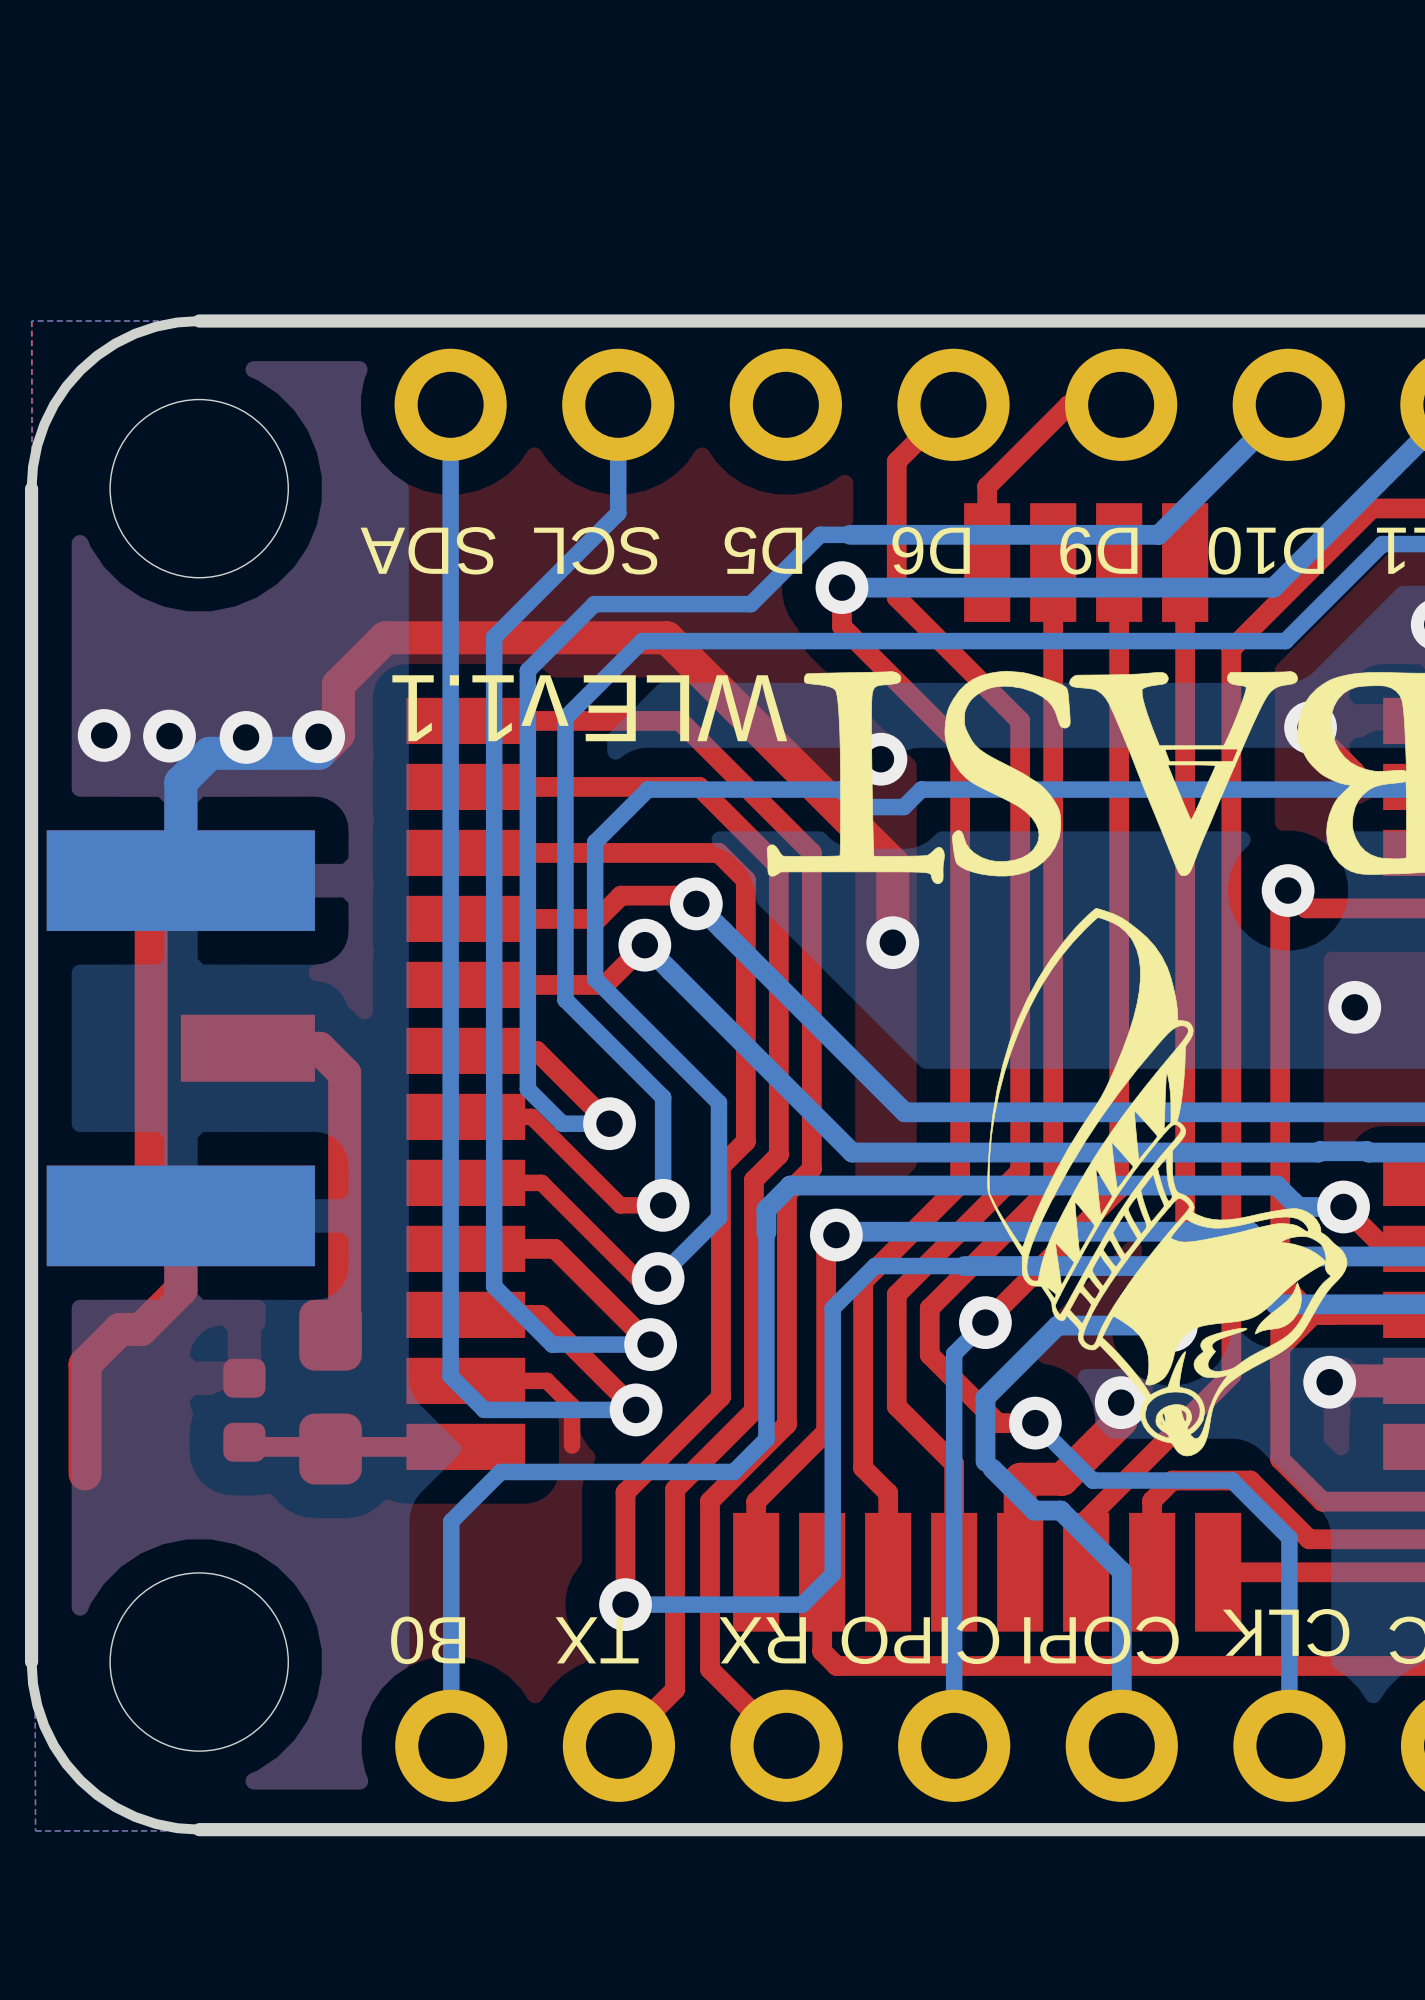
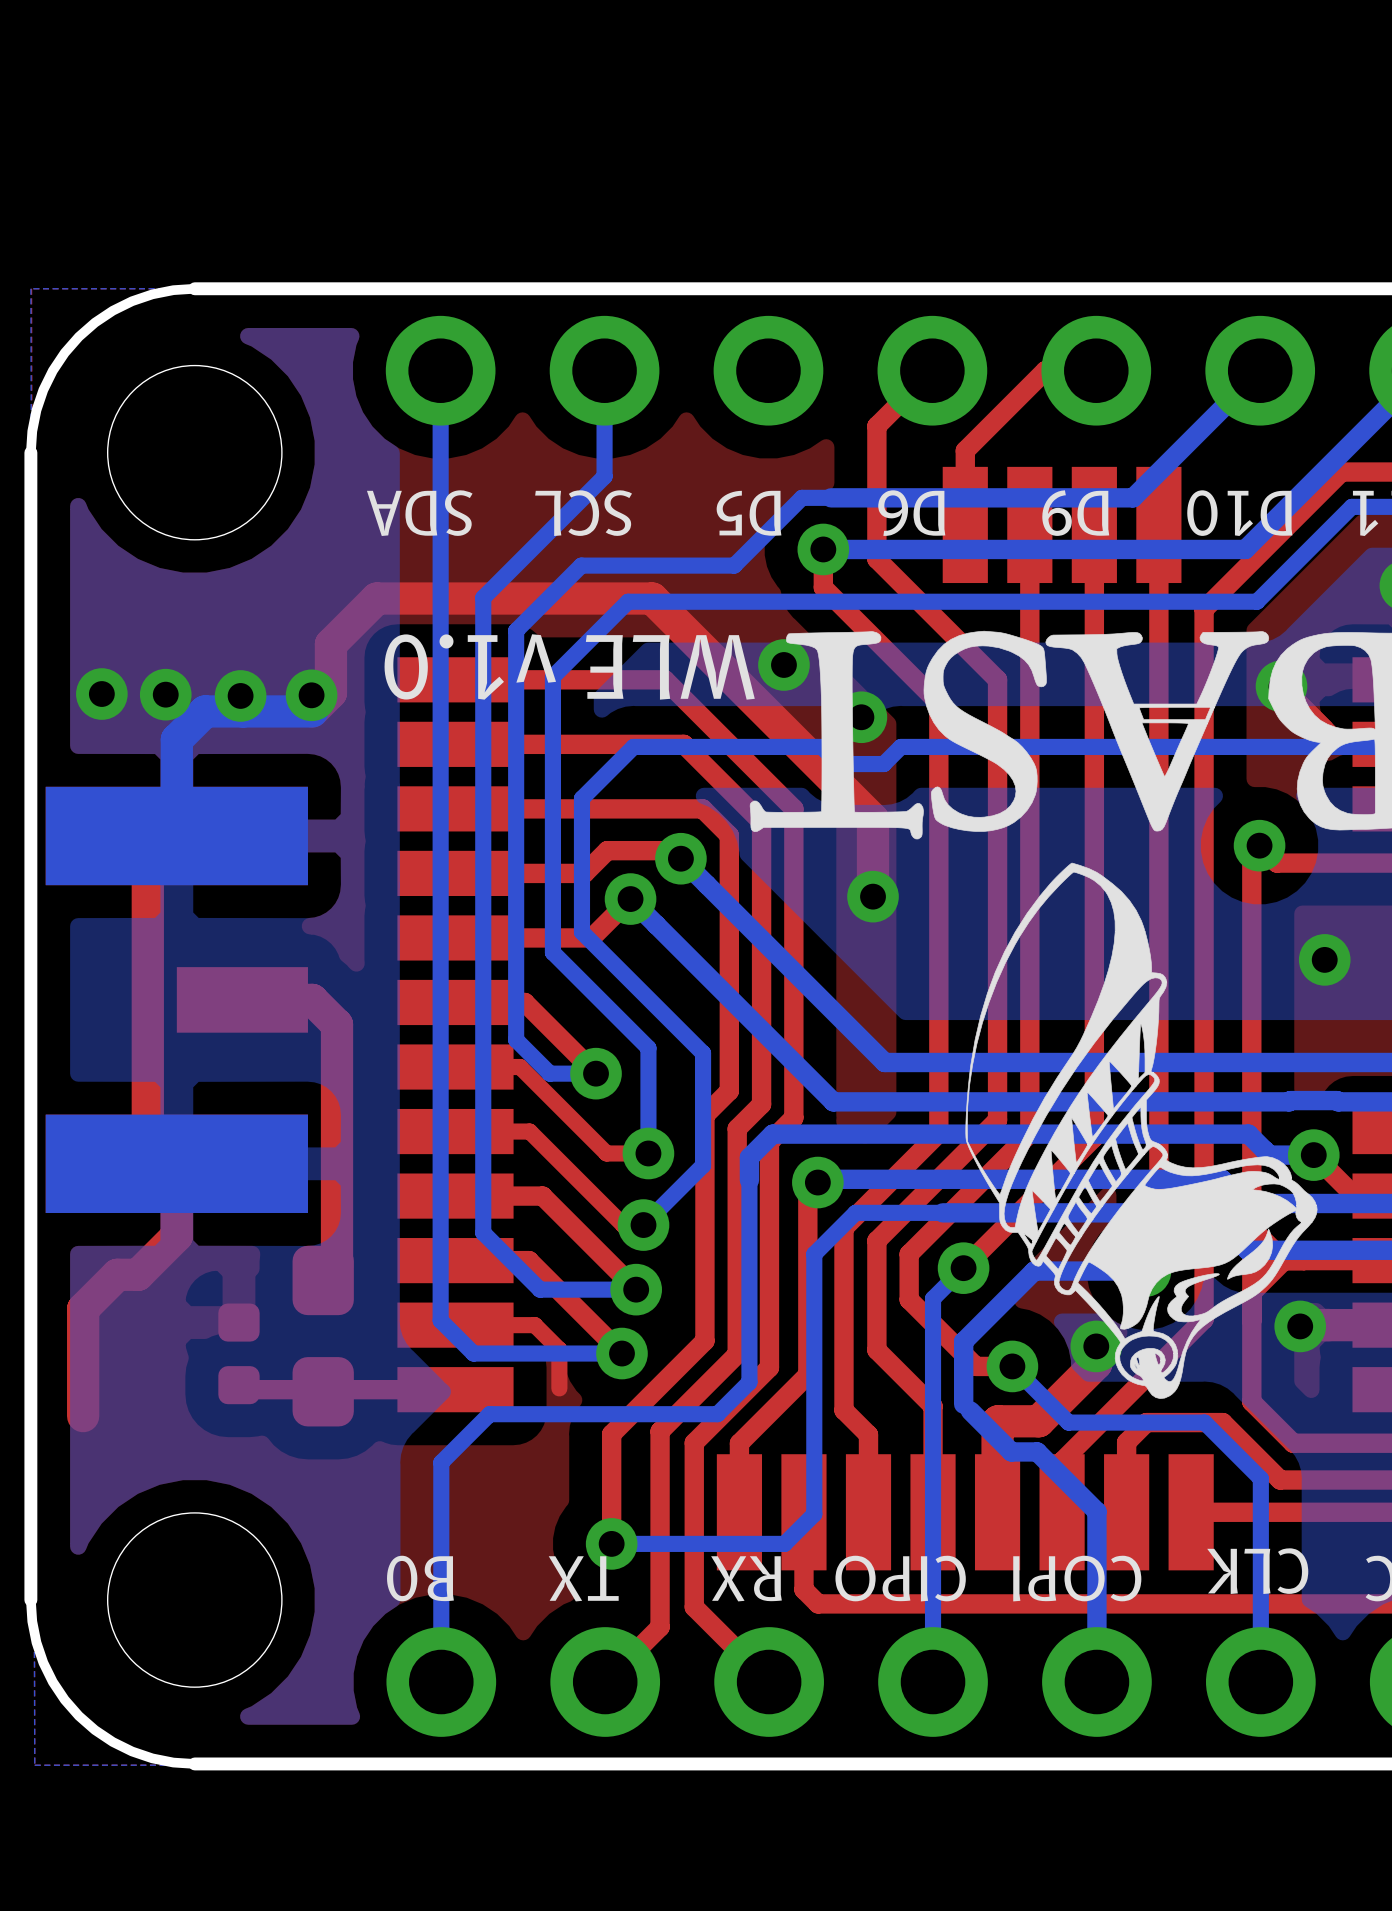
via: none -> (783, 664)
text: v1.1 (480, 708) -> v1.0 (470, 666)

